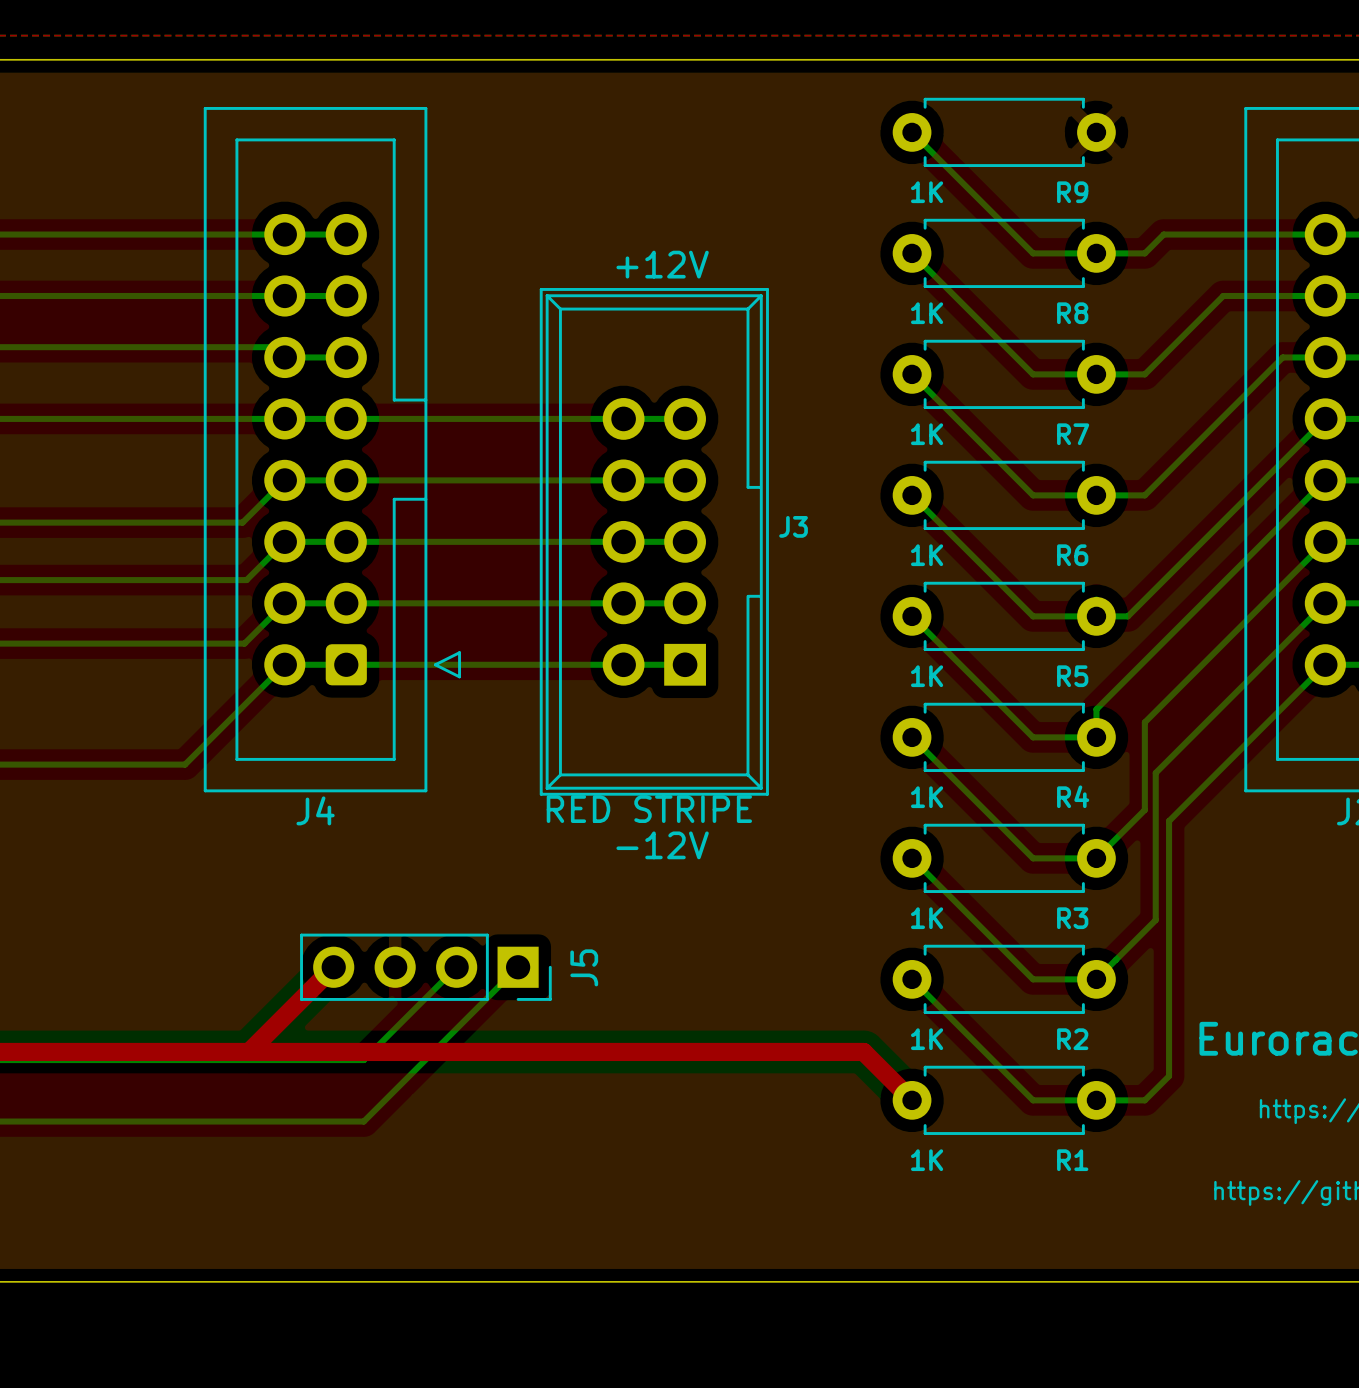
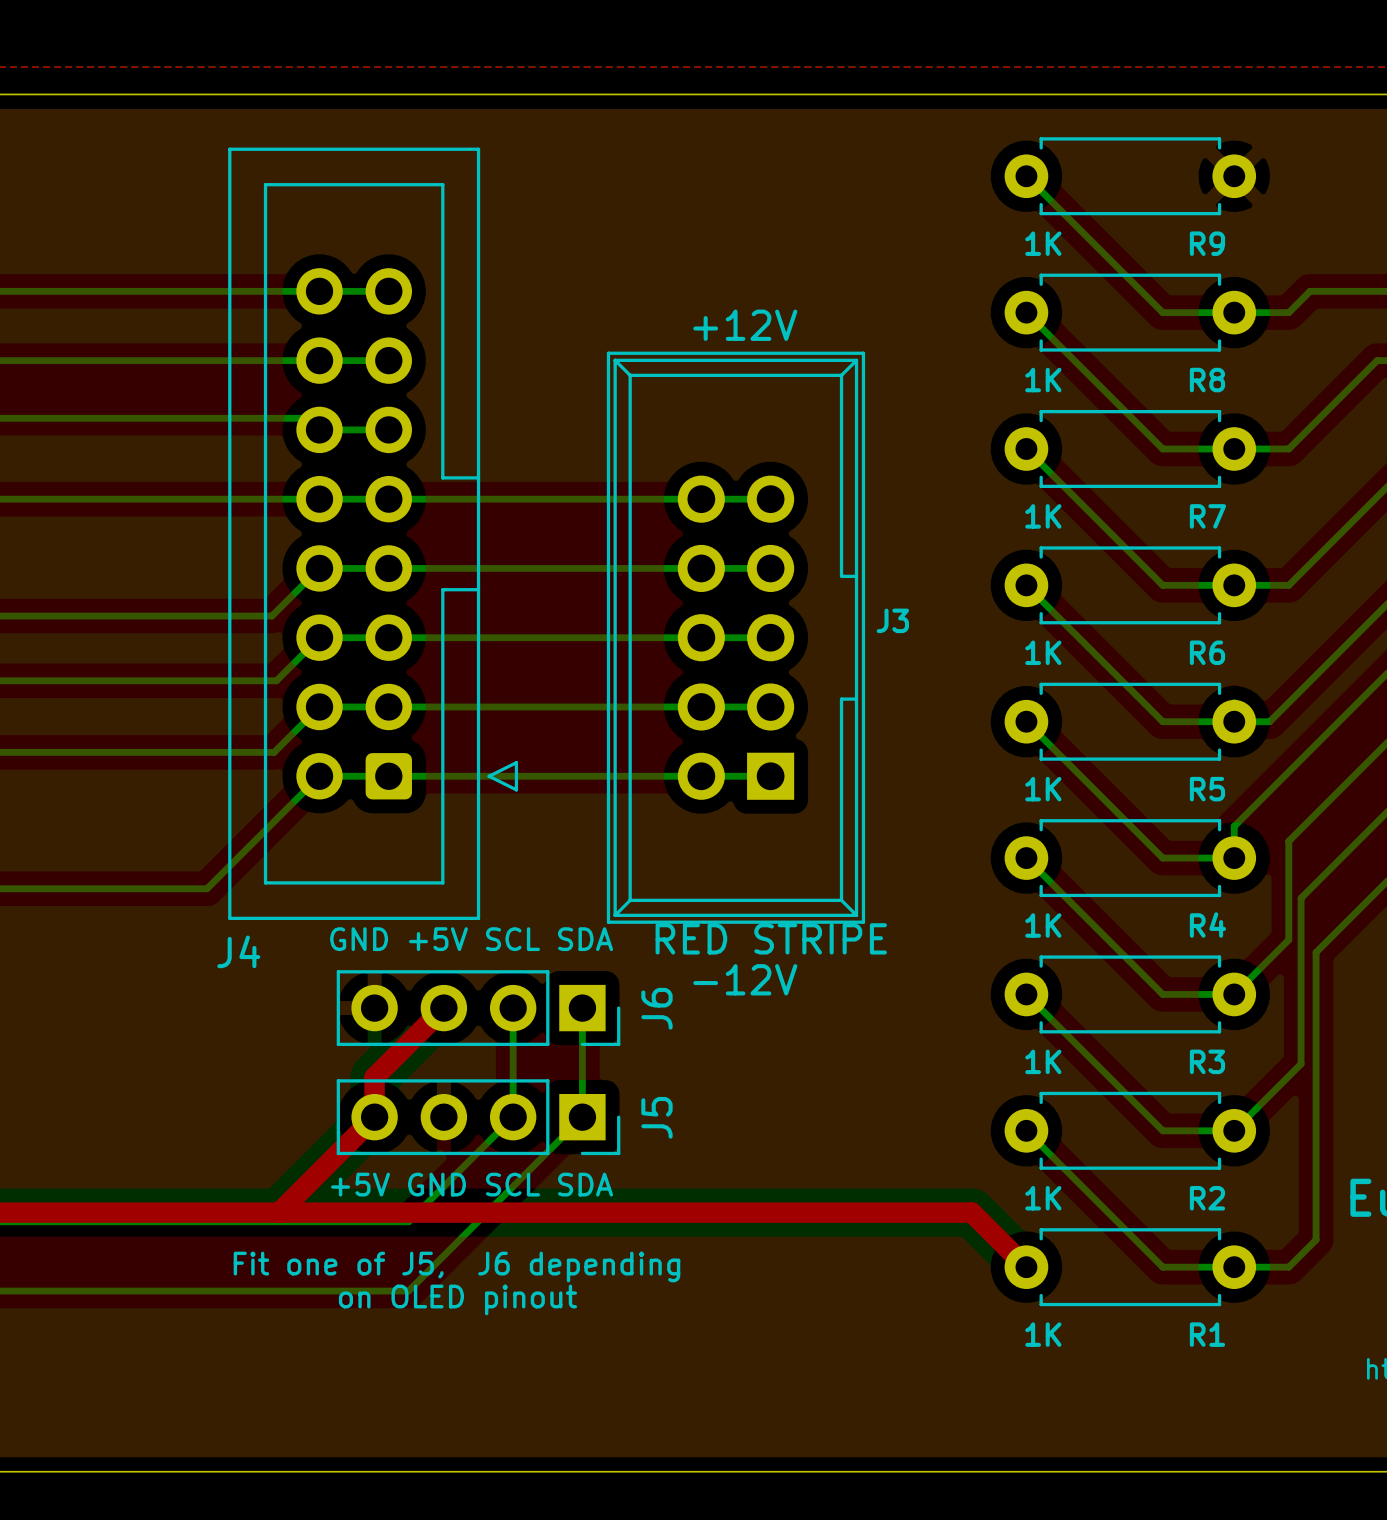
text: none -> GND +5V SCL SDA (471, 939)
J3 text position: RED STRIPE (649, 809) -> RED STRIPE (771, 938)
J4 name position: J4 (315, 810) -> J4 (238, 951)
top track: none -> (443, 1008) (374, 1077) (374, 1117)
J6: none -> (478, 1008)
bottom track: none -> (513, 1008) (513, 1117)
bottom track: none -> (582, 1008) (582, 1117)
text: none -> +5V GND SCL SDA (472, 1184)
text: none -> Fit one of J5, J6 depending (456, 1266)
text: none -> on OLED pinout (457, 1299)

